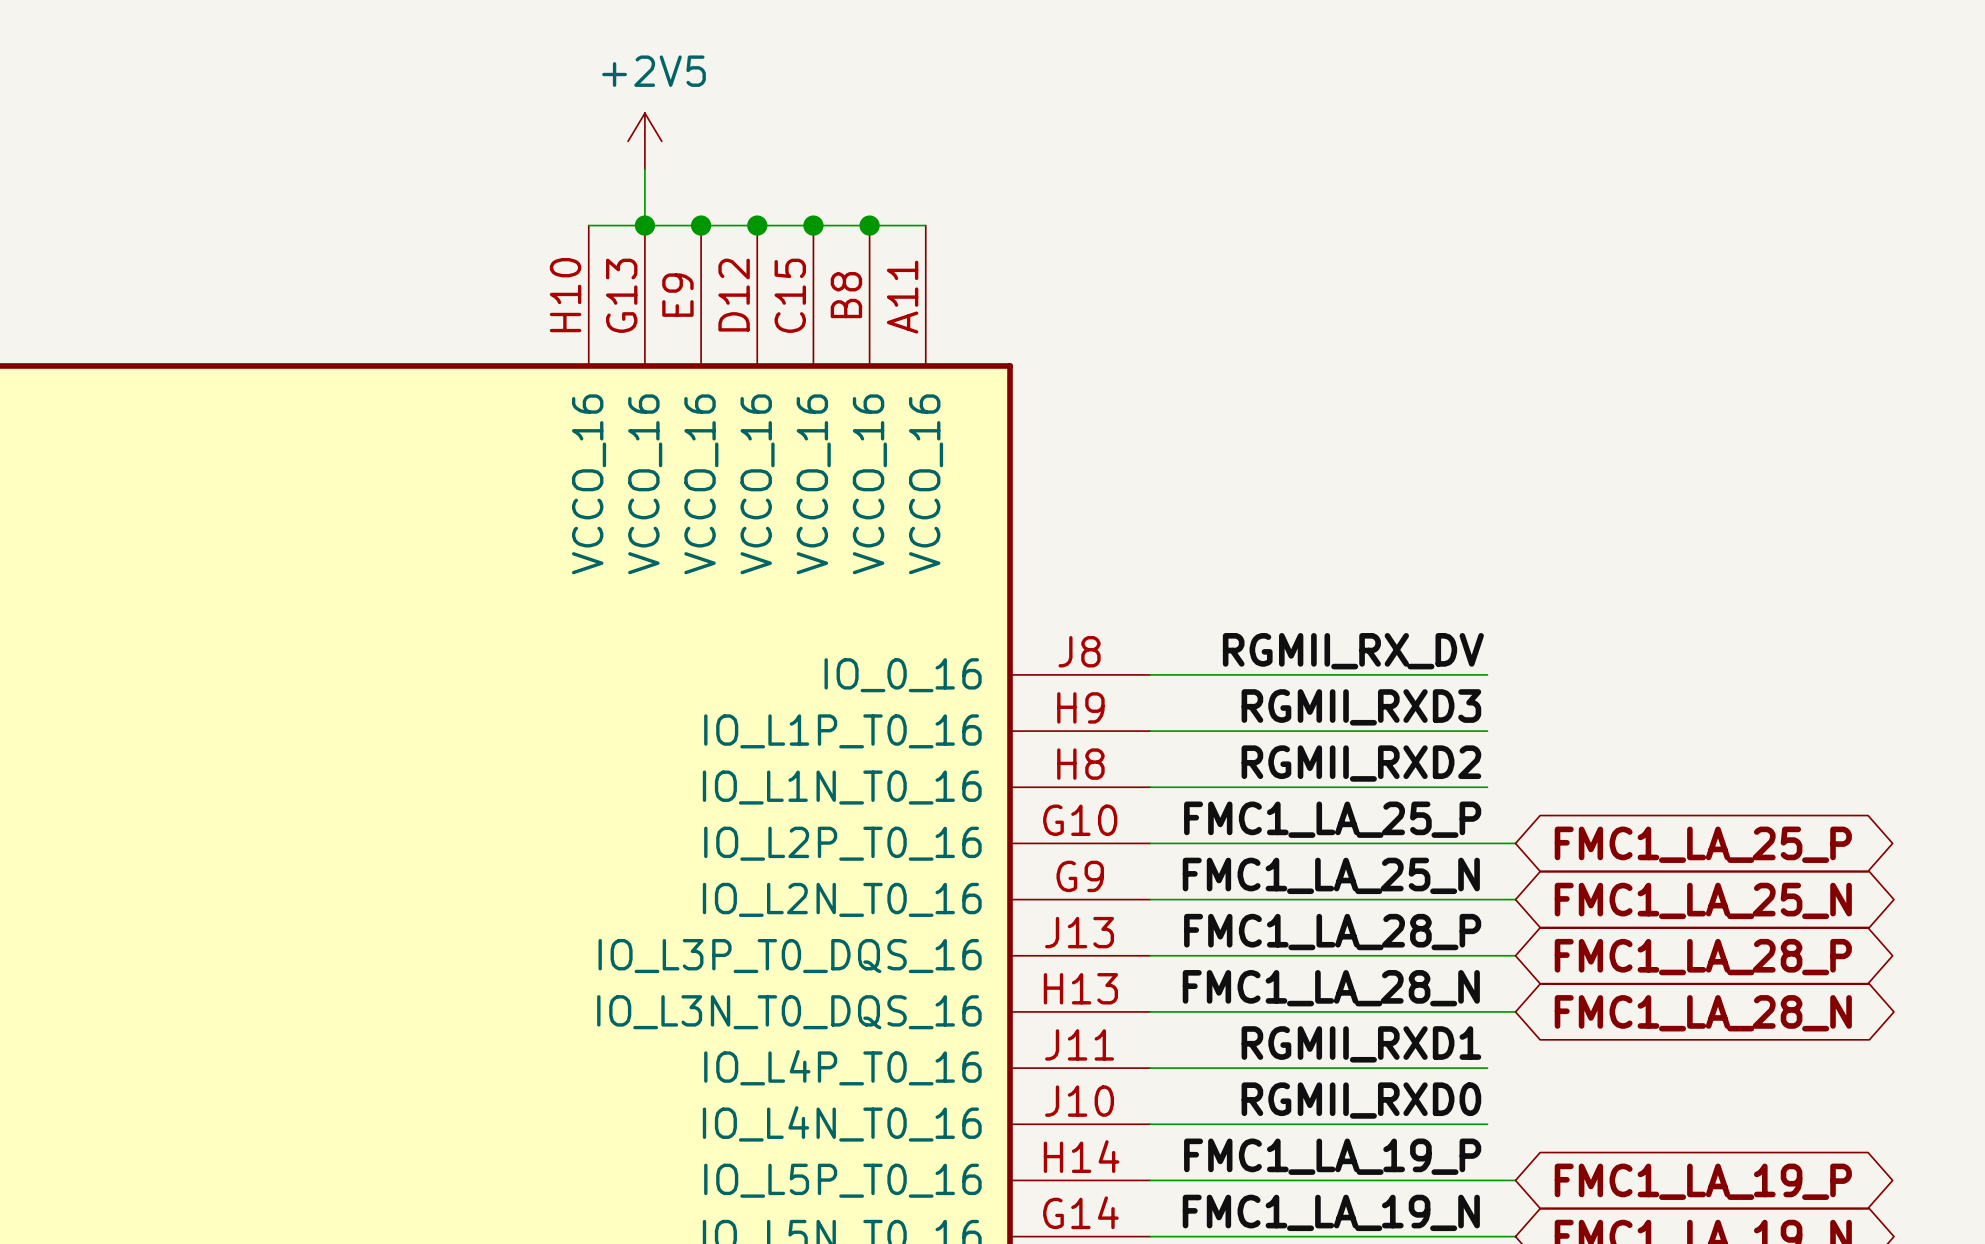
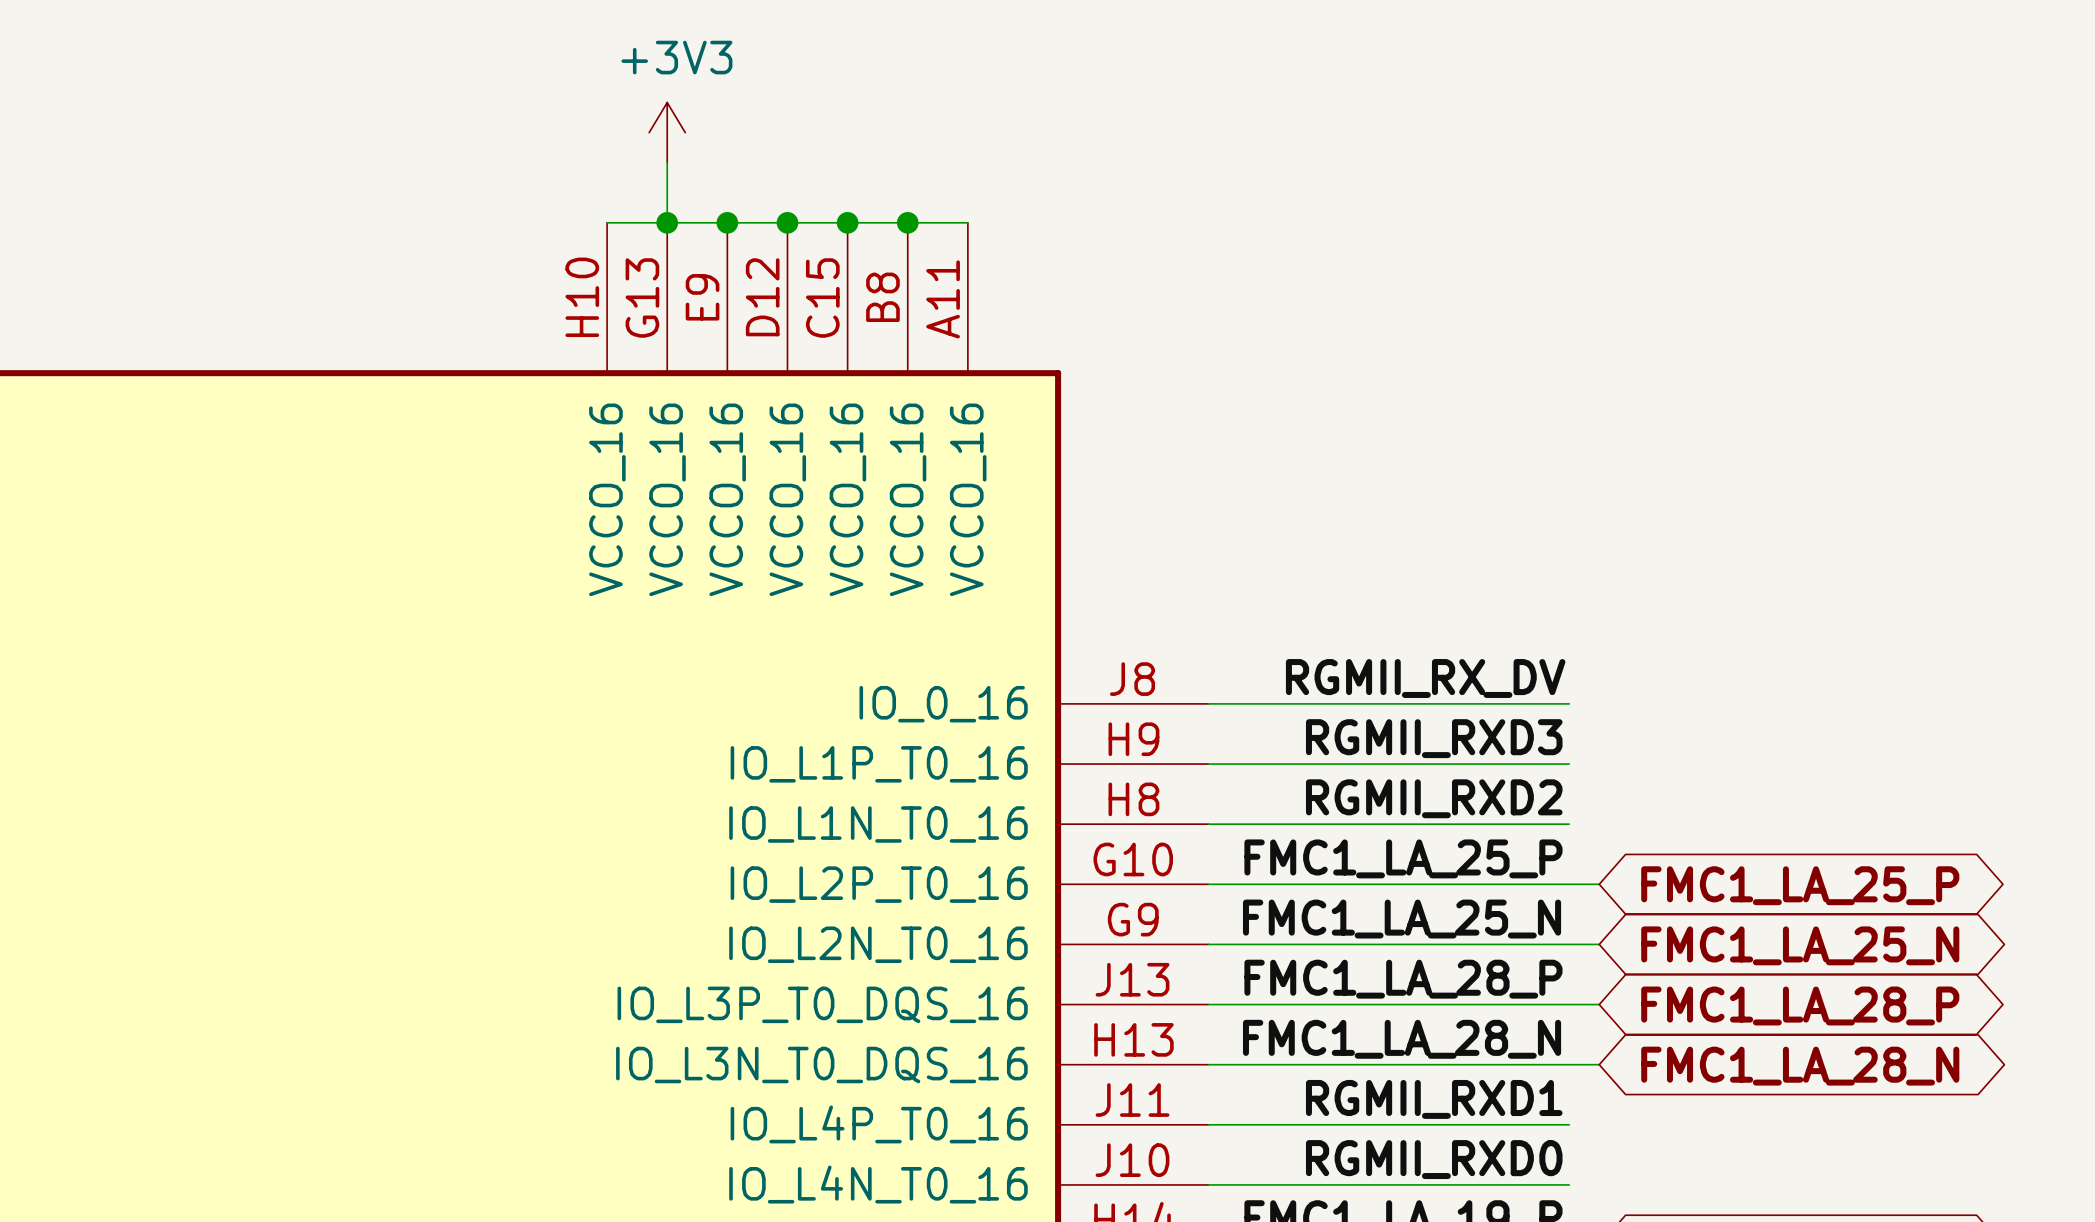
power symbol: +2V5 (644, 141) -> +3V3 (667, 132)

